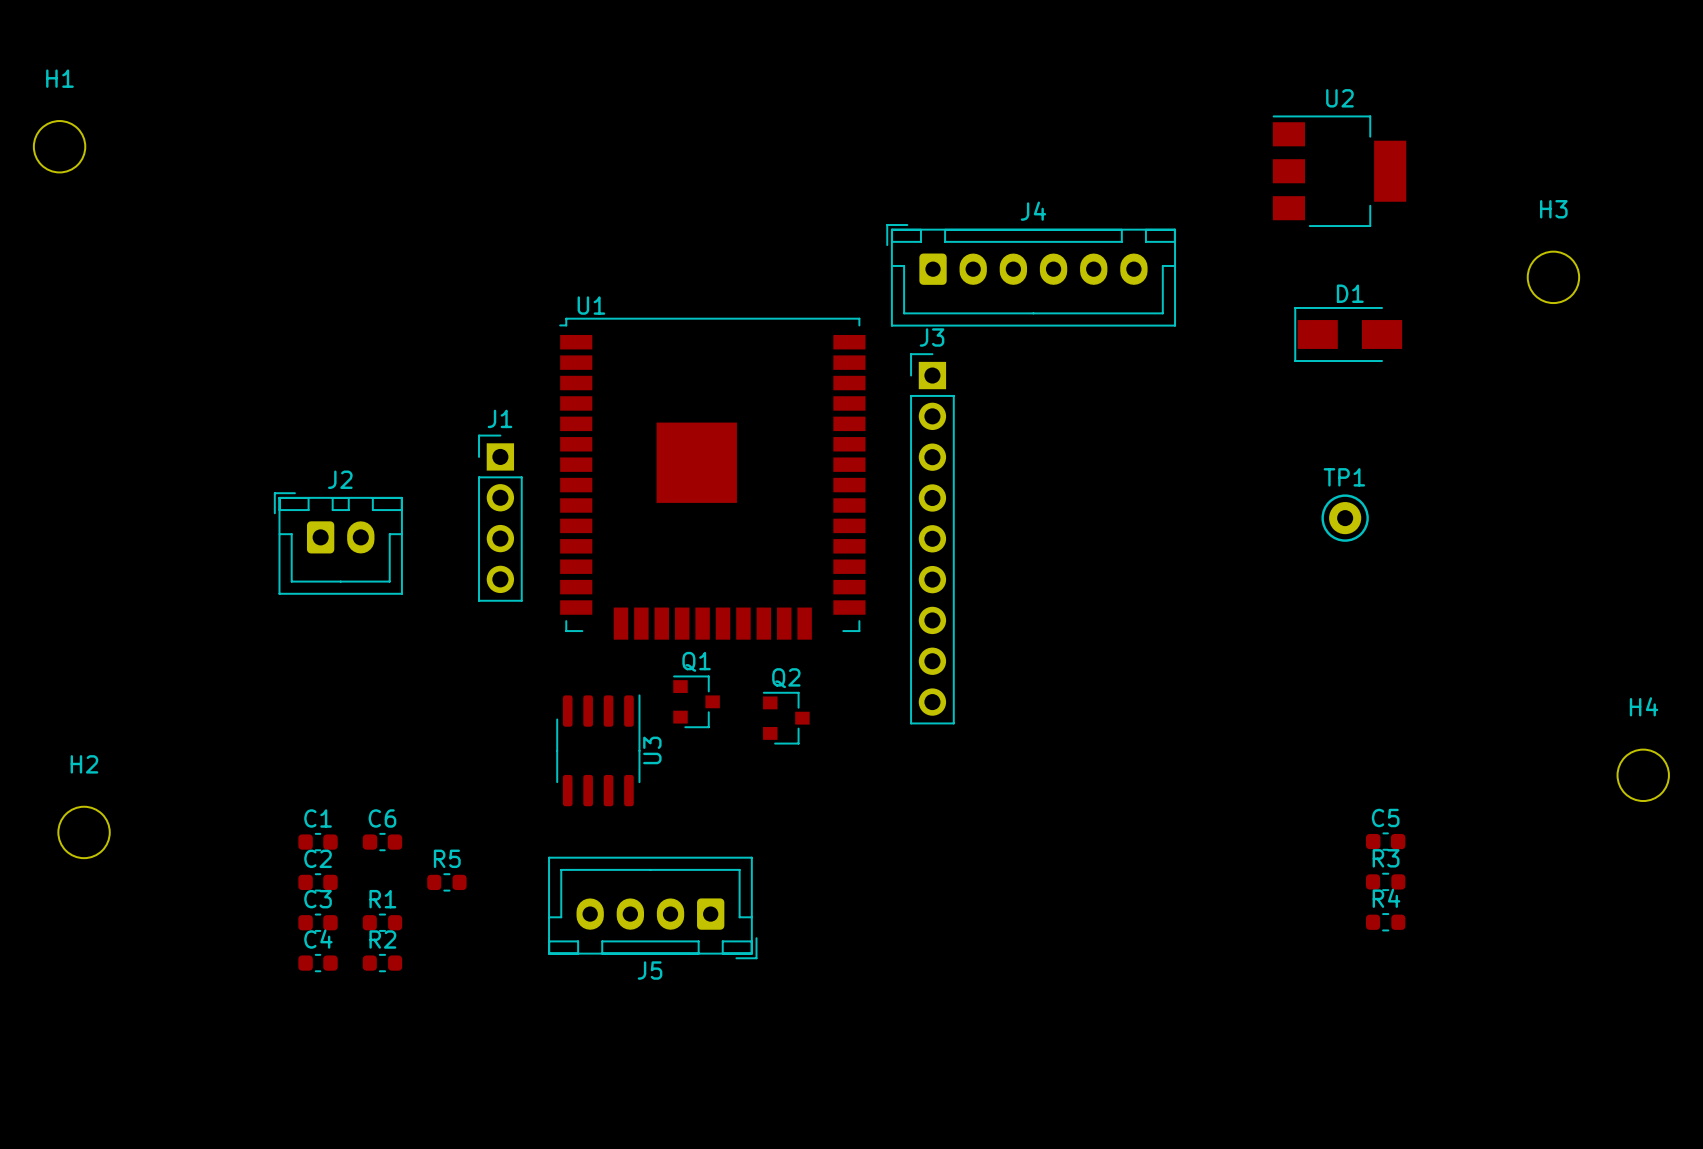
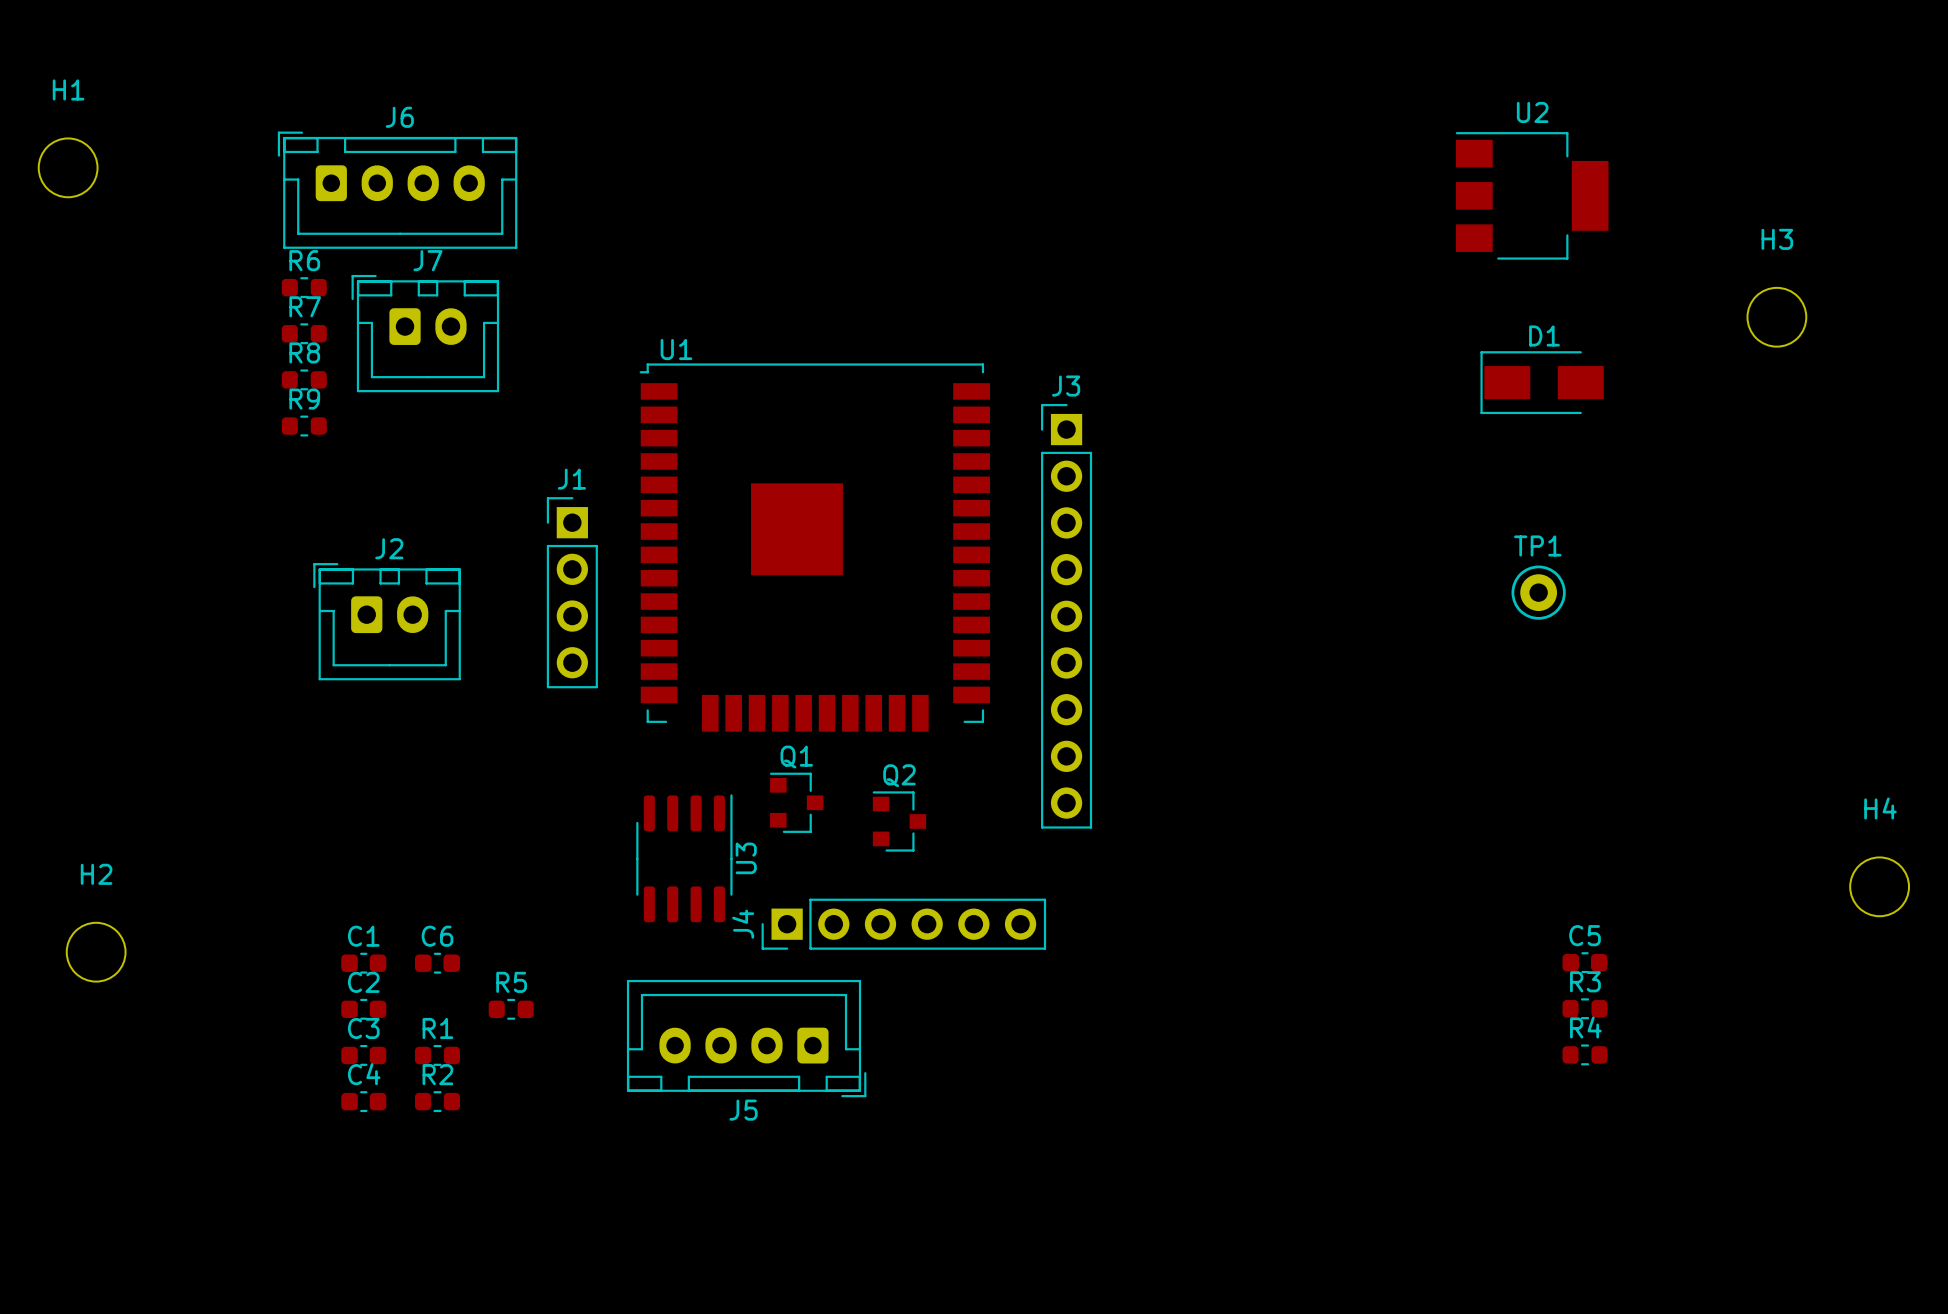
J6: none -> (397, 190)
J4 name position: J4 (1033, 211) -> J4 (743, 924)
J4 footprint: [886, 224, 1177, 327] -> [761, 898, 1047, 950]
R6: none -> (304, 287)
R7: none -> (304, 333)
J7: none -> (425, 333)
R8: none -> (304, 379)
R9: none -> (304, 426)

